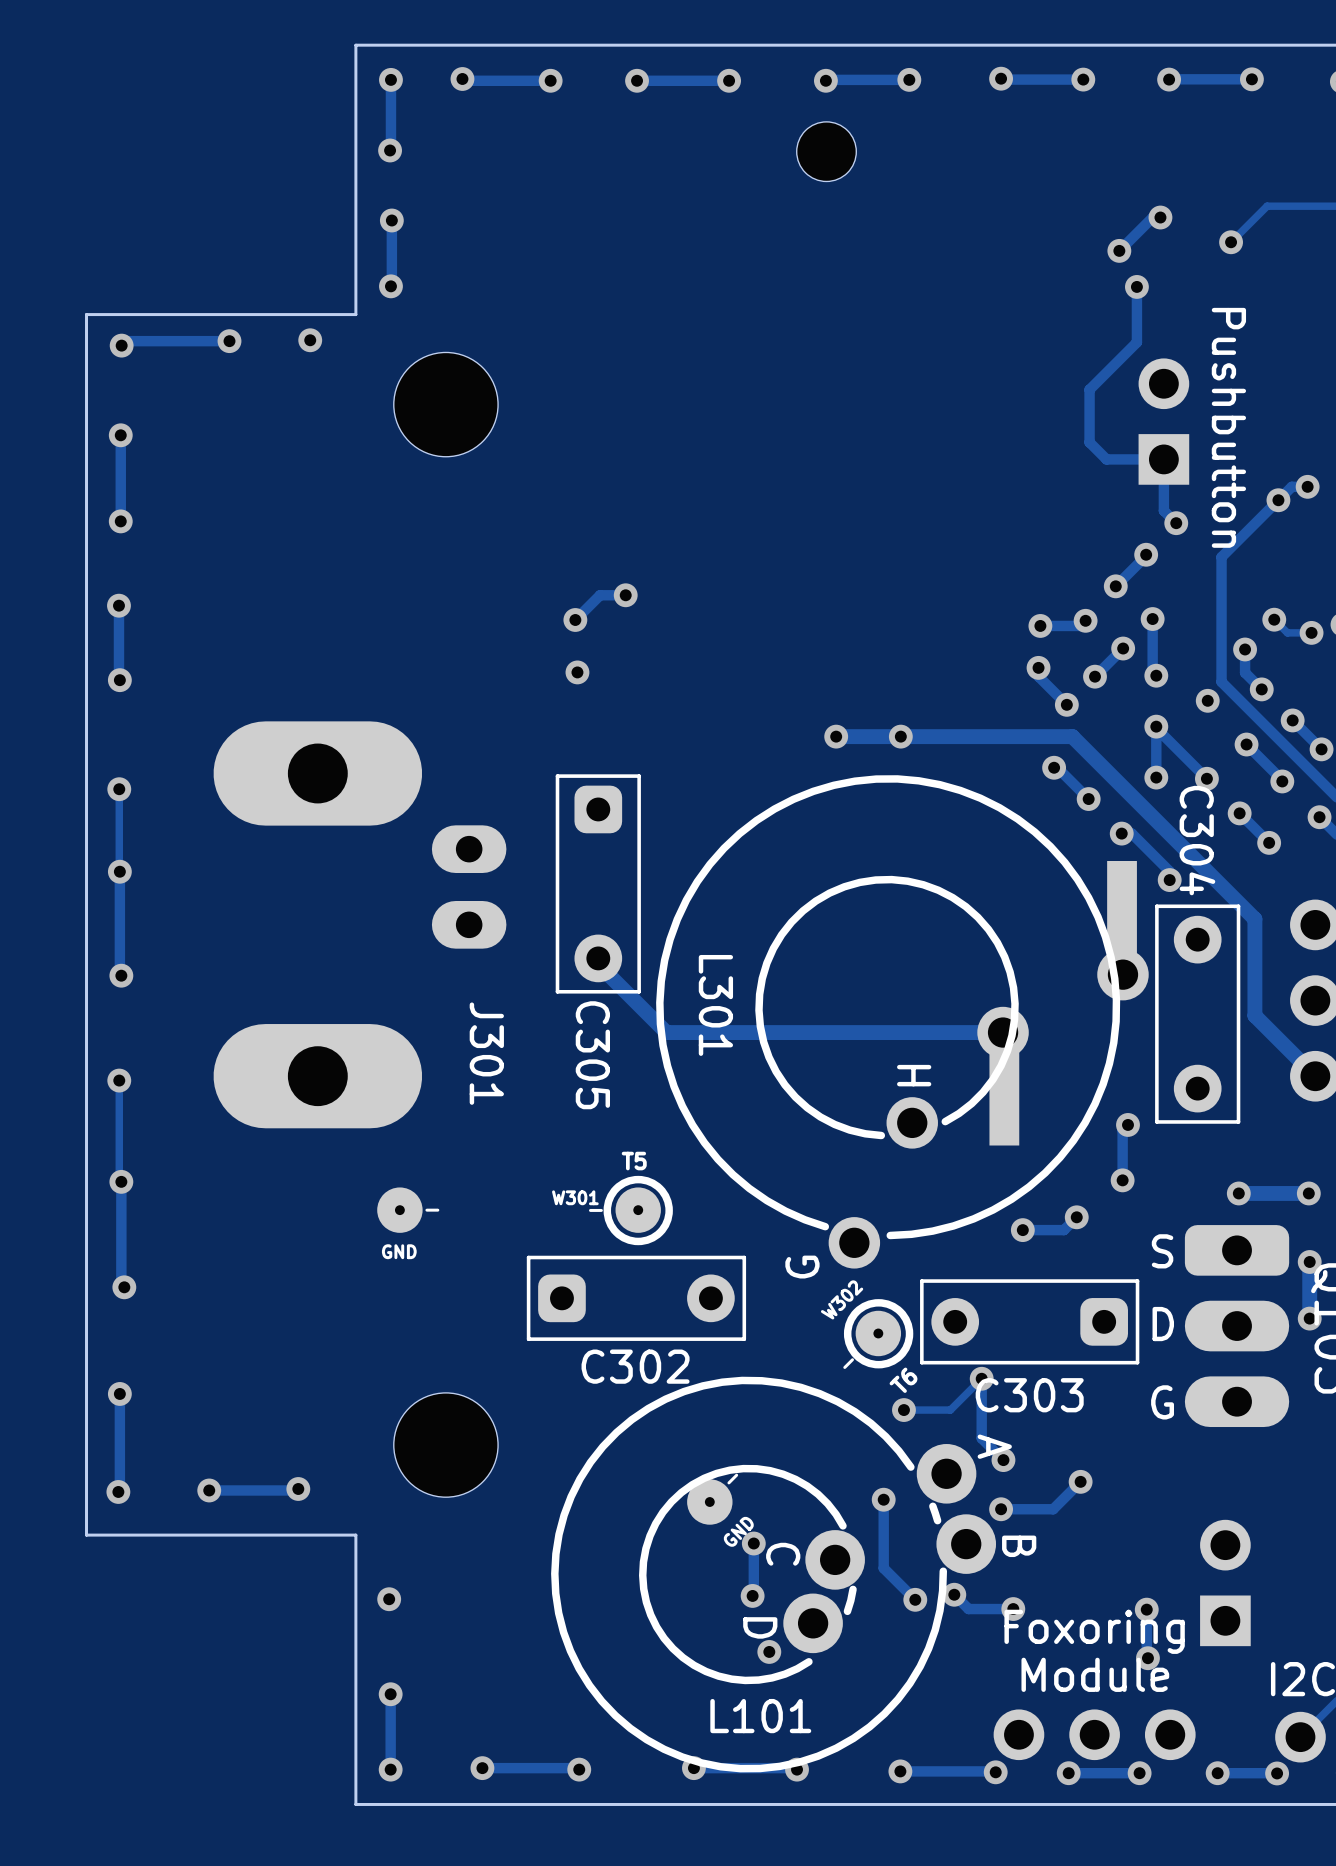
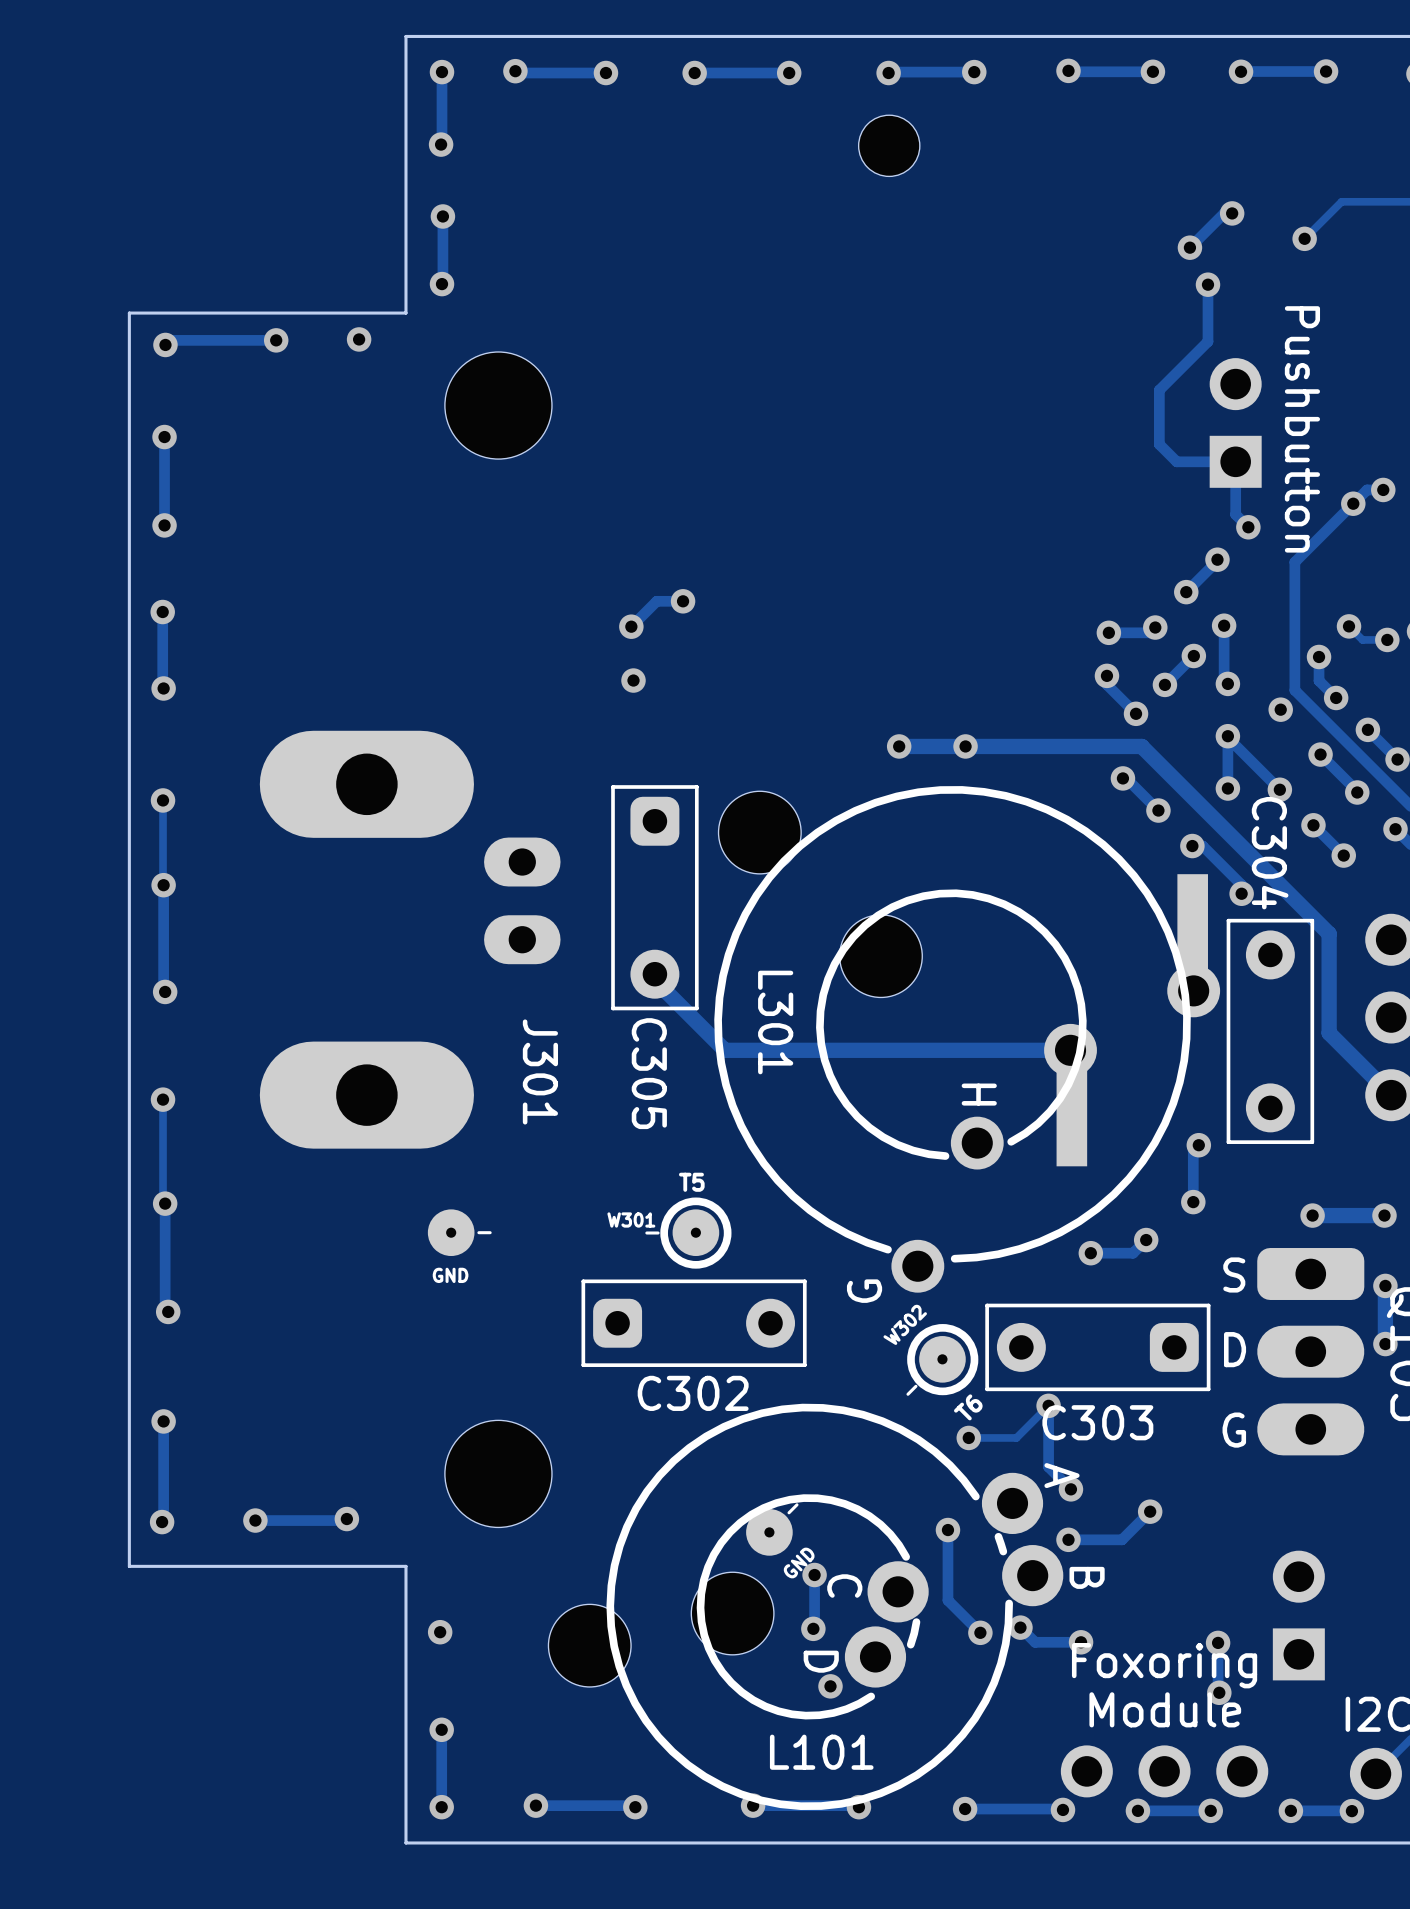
part: none -> (759, 832)
part: none -> (880, 956)
part: none -> (732, 1613)
part: none -> (589, 1645)

